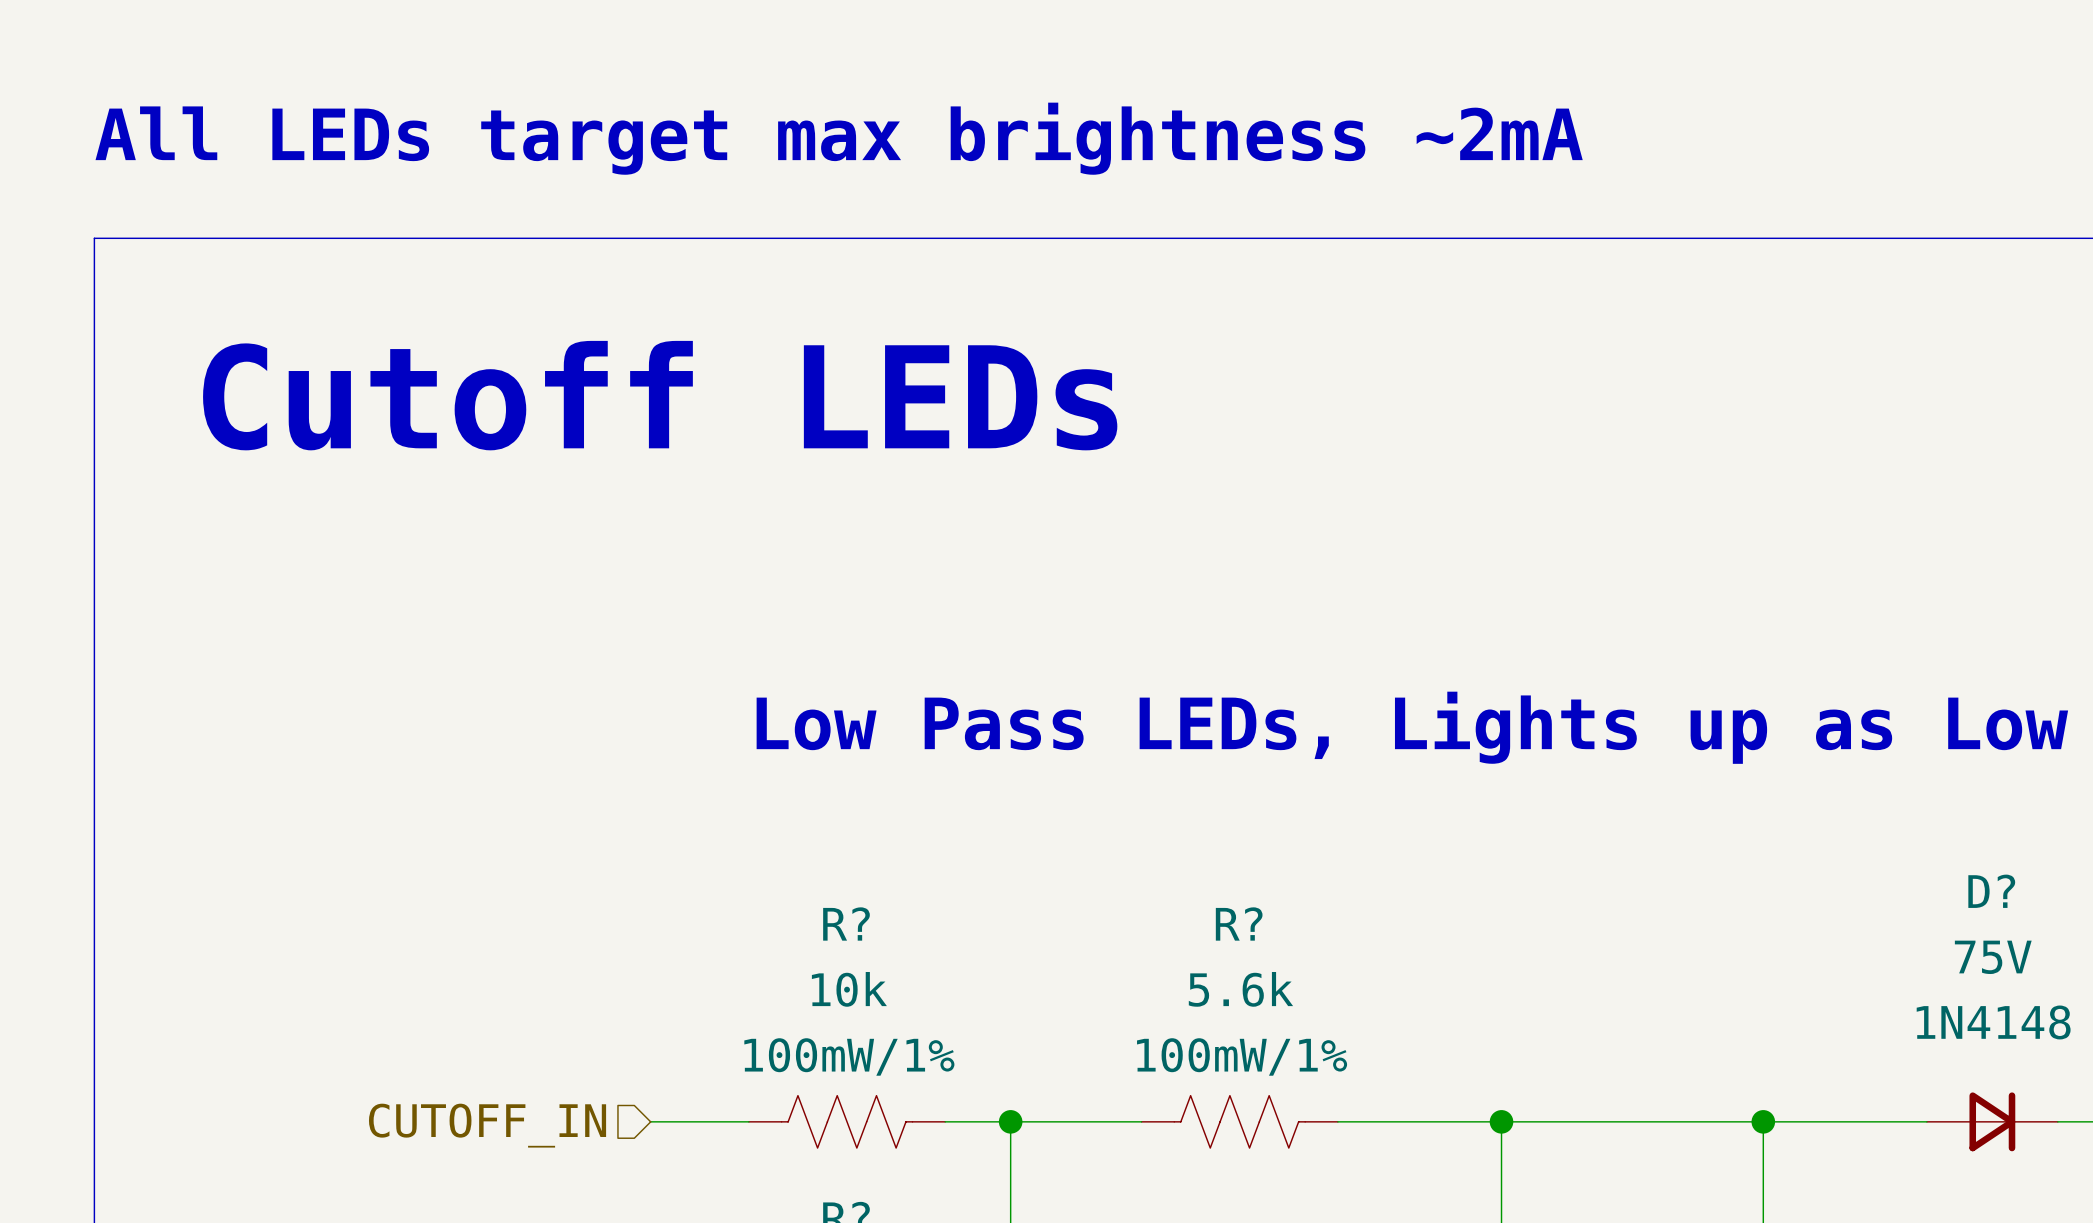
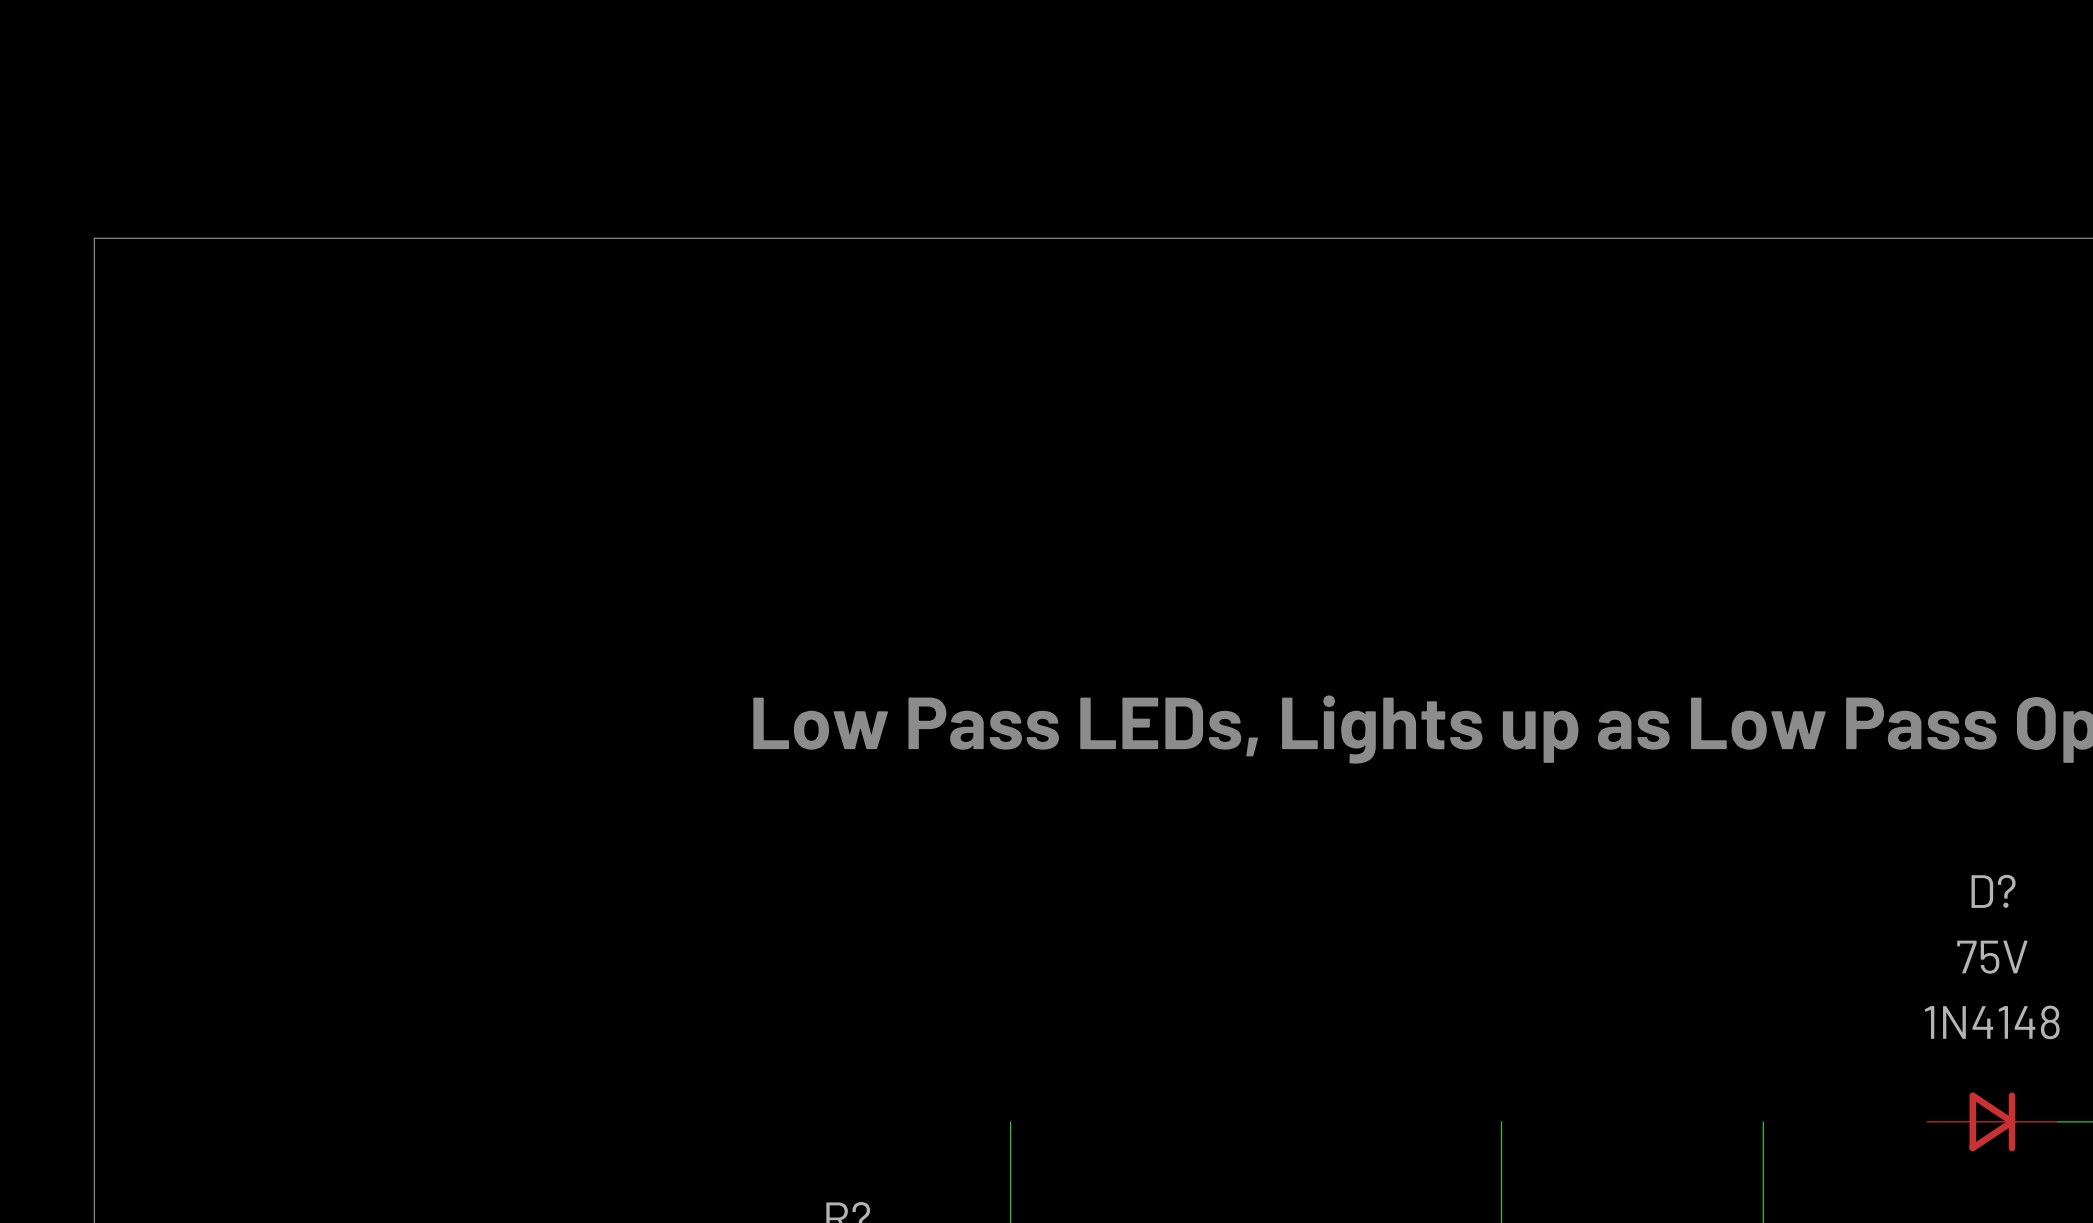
text: All LEDs target max brightness ~2mA (839, 138) -> none
text: Cutoff LEDs (660, 395) -> none
wire: (650, 1121) (748, 1121) -> none
R?: 10k (847, 1121) -> none
wire: (945, 1121) (1141, 1121) -> none
junction: (1010, 1121) -> none
R?: 5.6k (1239, 1121) -> none
wire: (1337, 1121) (1926, 1121) -> none
junction: (1501, 1121) -> none
junction: (1763, 1121) -> none
hierarchical label: CUTOFF_IN (487, 1125) -> none

